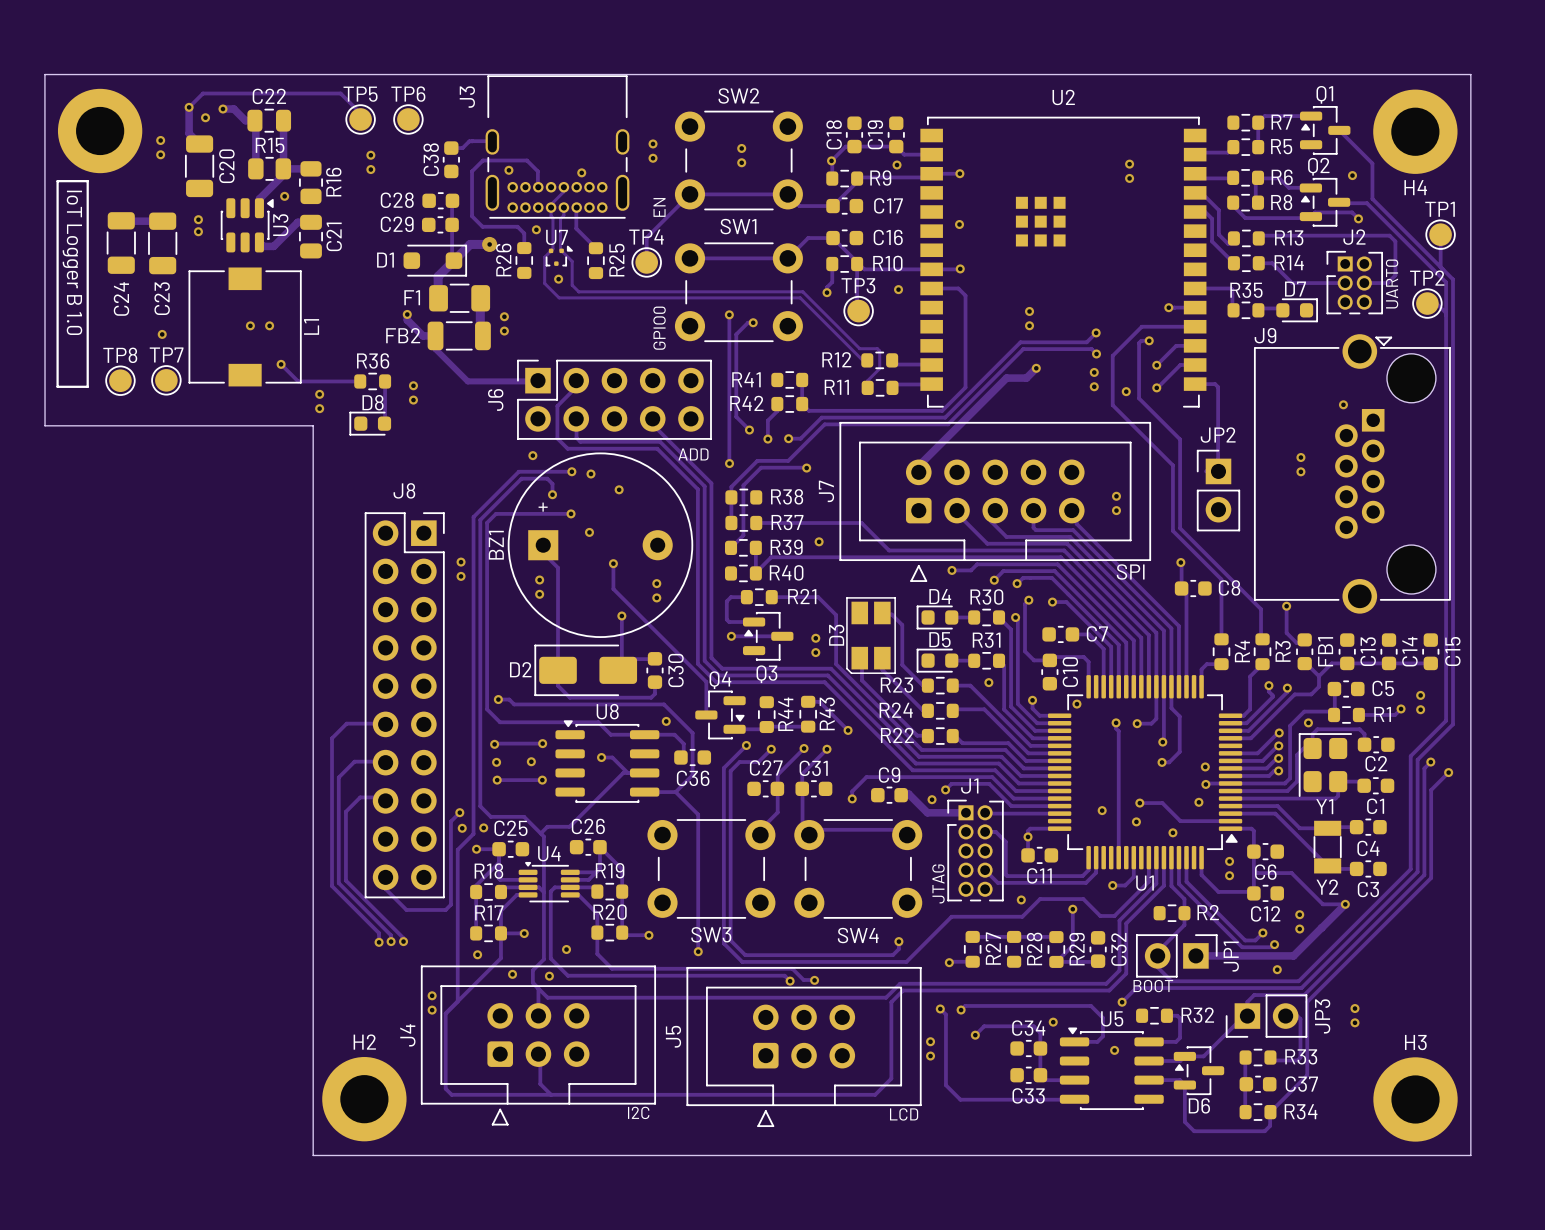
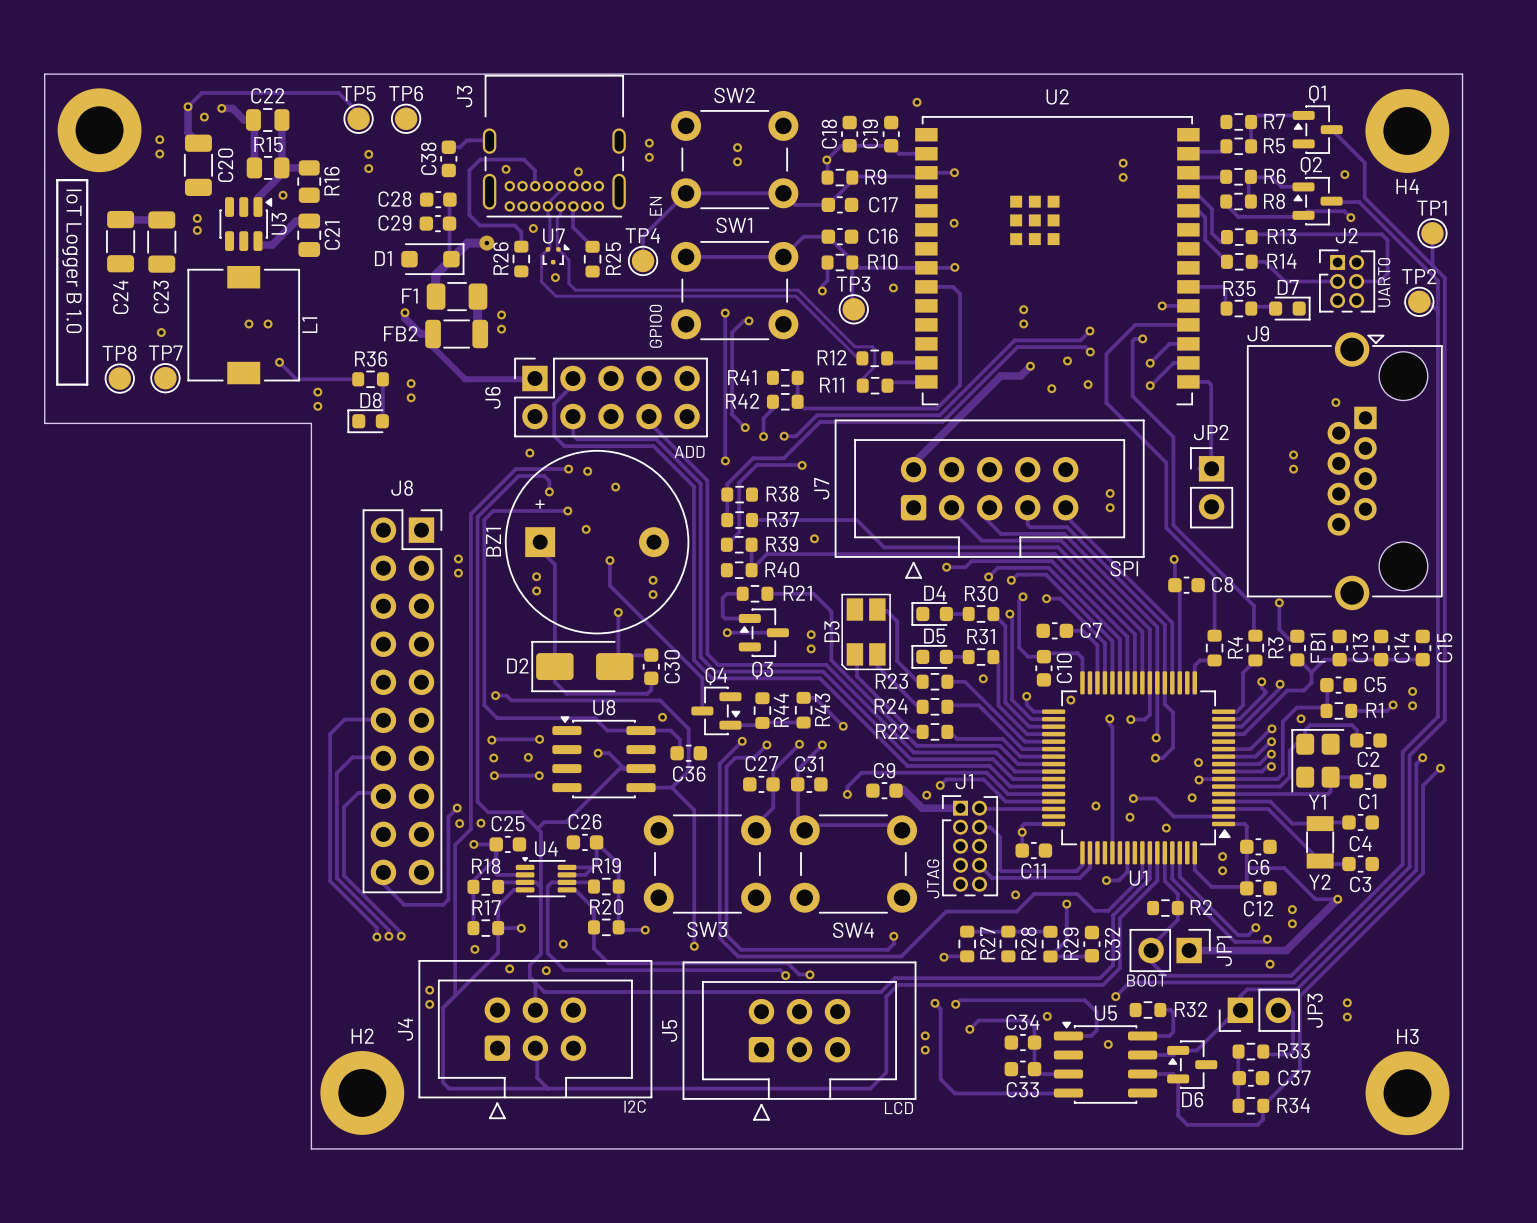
via position: (897, 165) -> (917, 102)
via: none -> (1067, 360)
via: (1094, 372) -> none
via: none -> (1051, 388)
via: (1126, 391) -> none

